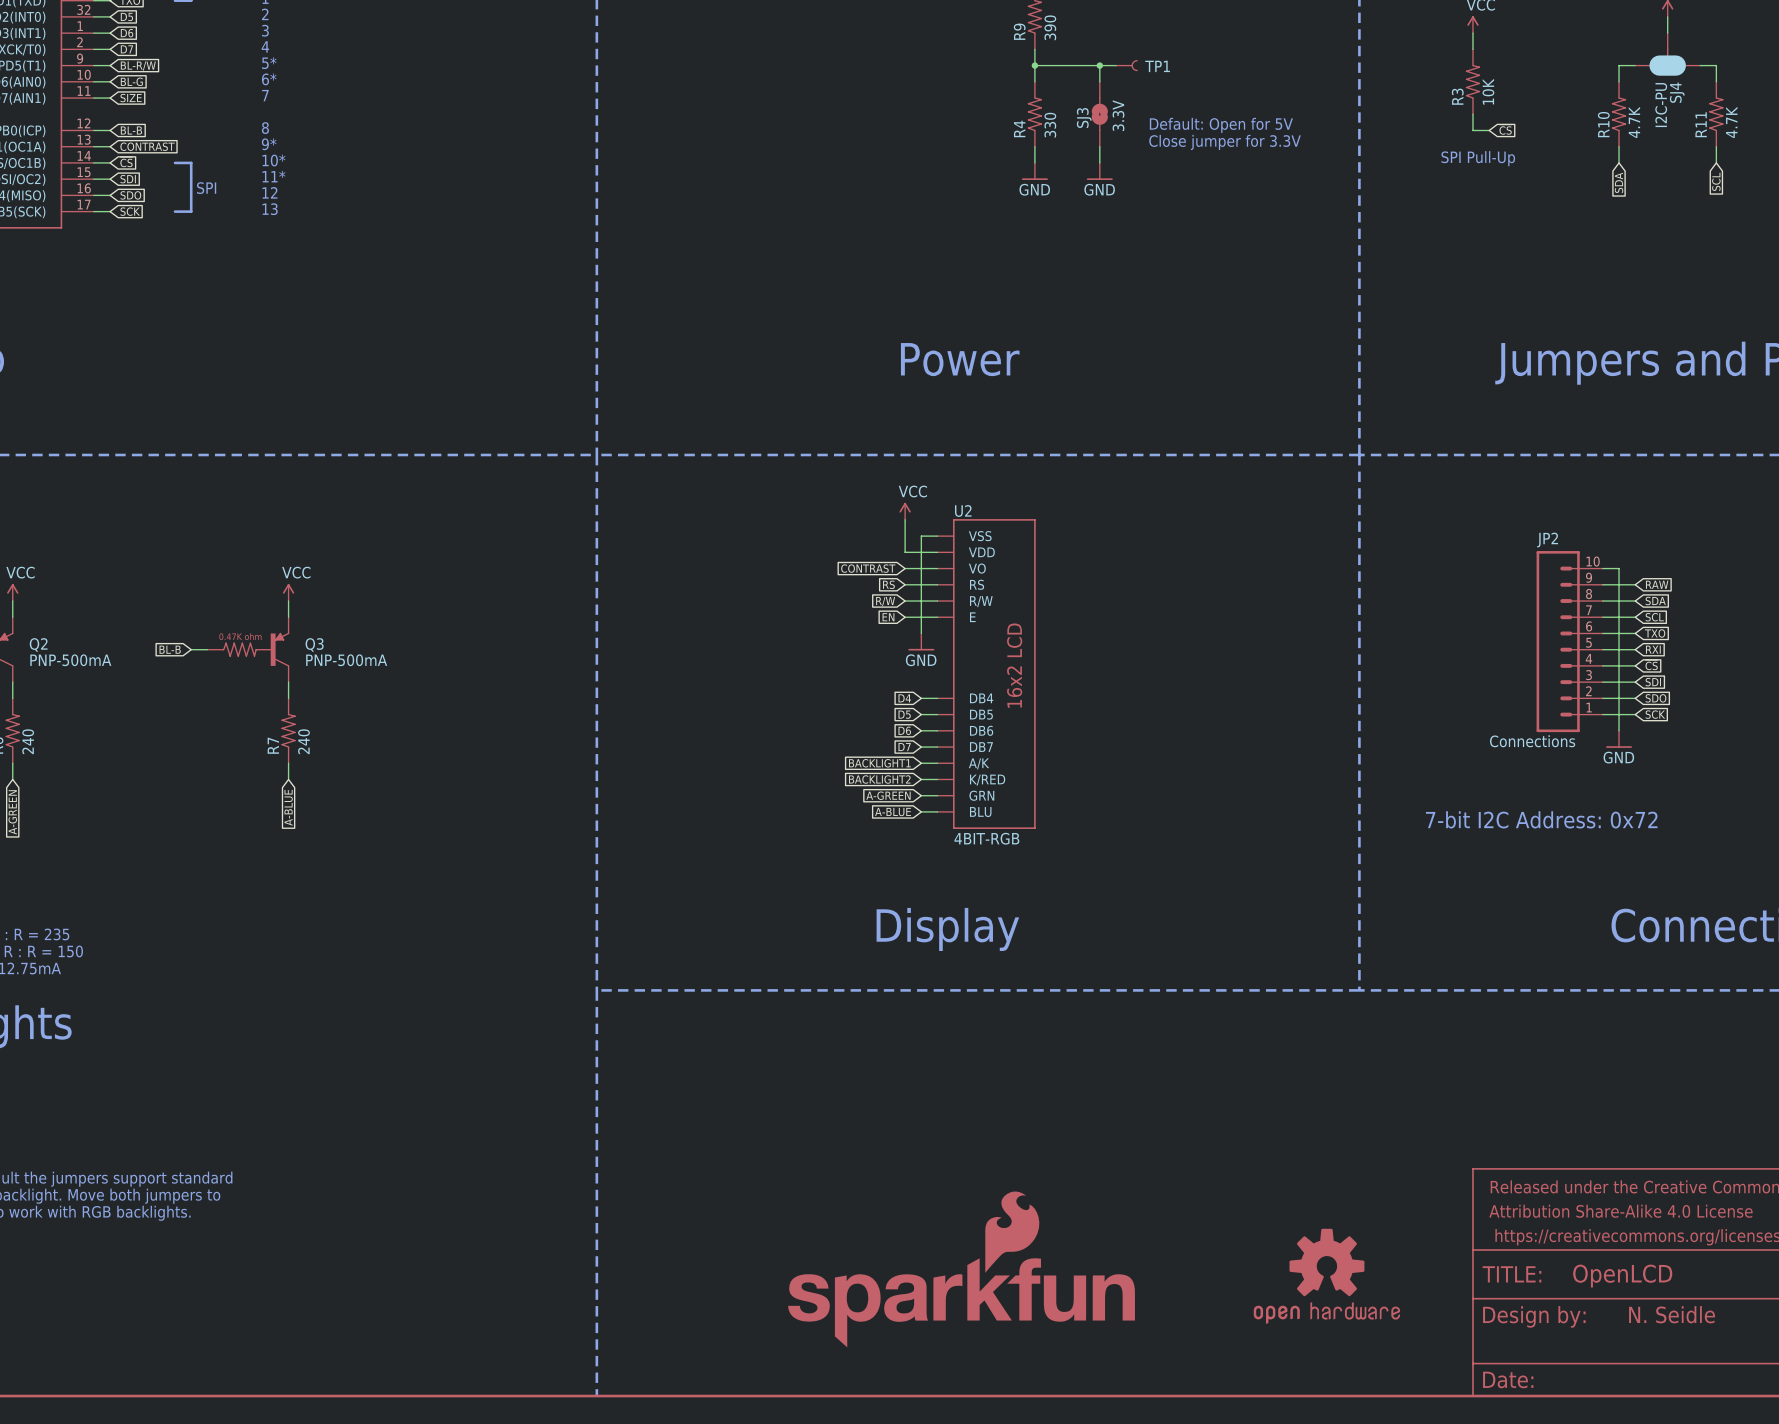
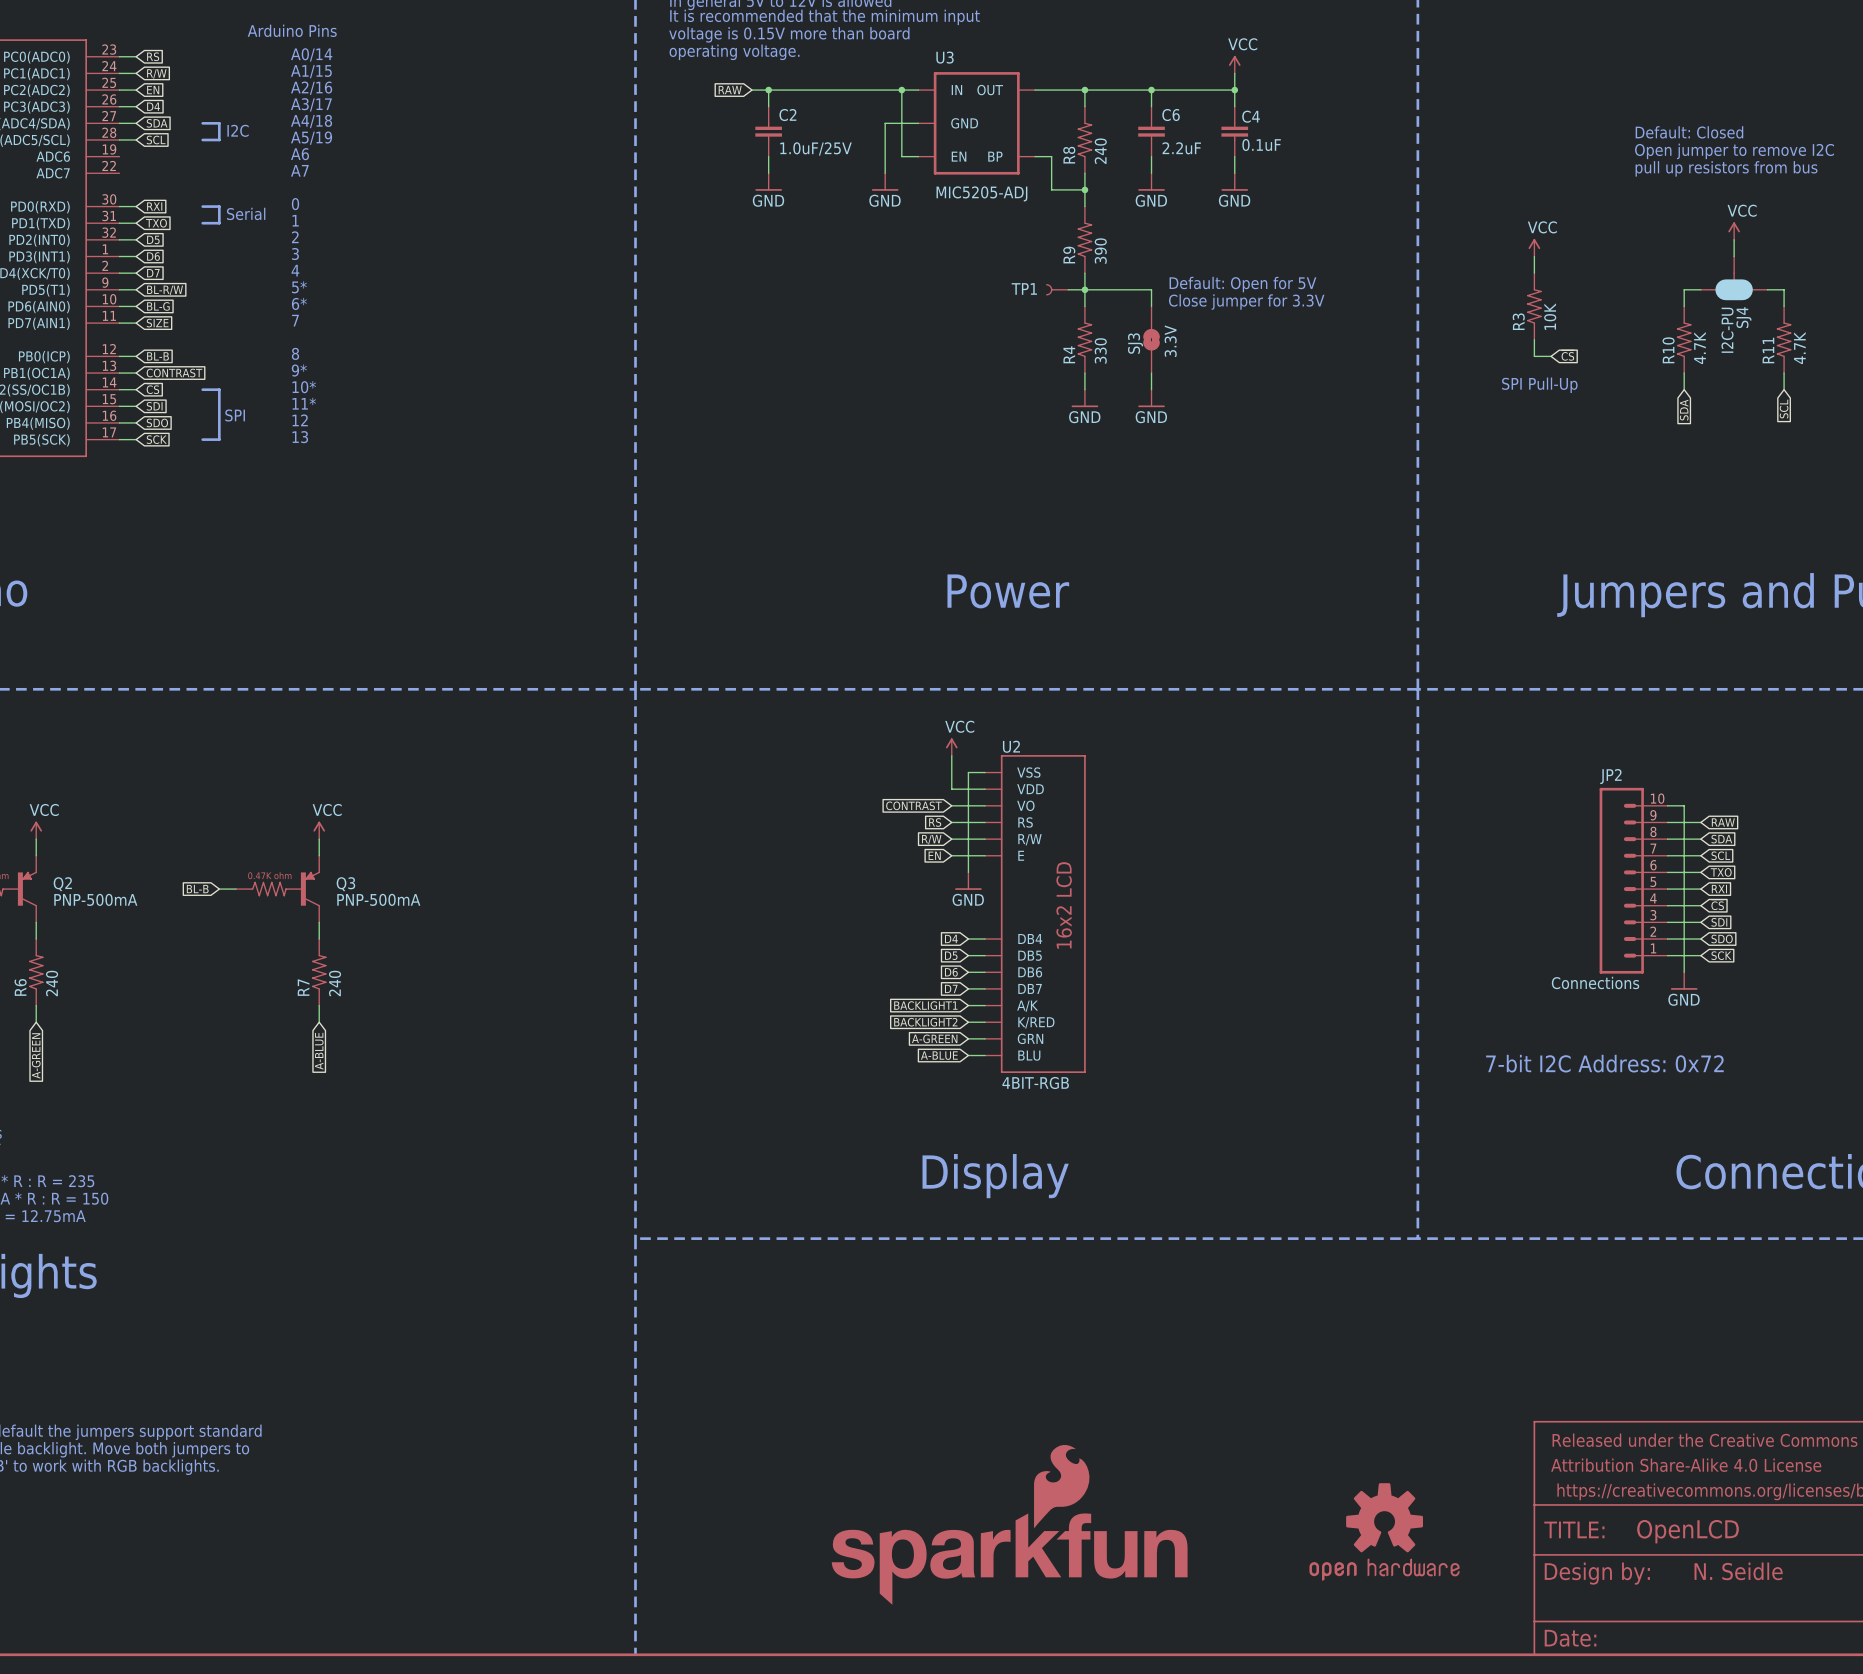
wire: (1099, 65) (1116, 65) -> (1068, 289) (1084, 289)
junction: (1099, 65) -> none
TP1 rotation: 0° (1126, 65) -> 180° (1057, 289)
TP1 position: (1126, 65) -> (1057, 289)
text position: Default: Open for 5V (1221, 125) -> Default: Open for 5V (1242, 284)
text position: Close jumper for 3.3V (1225, 142) -> Close jumper for 3.3V (1246, 302)

